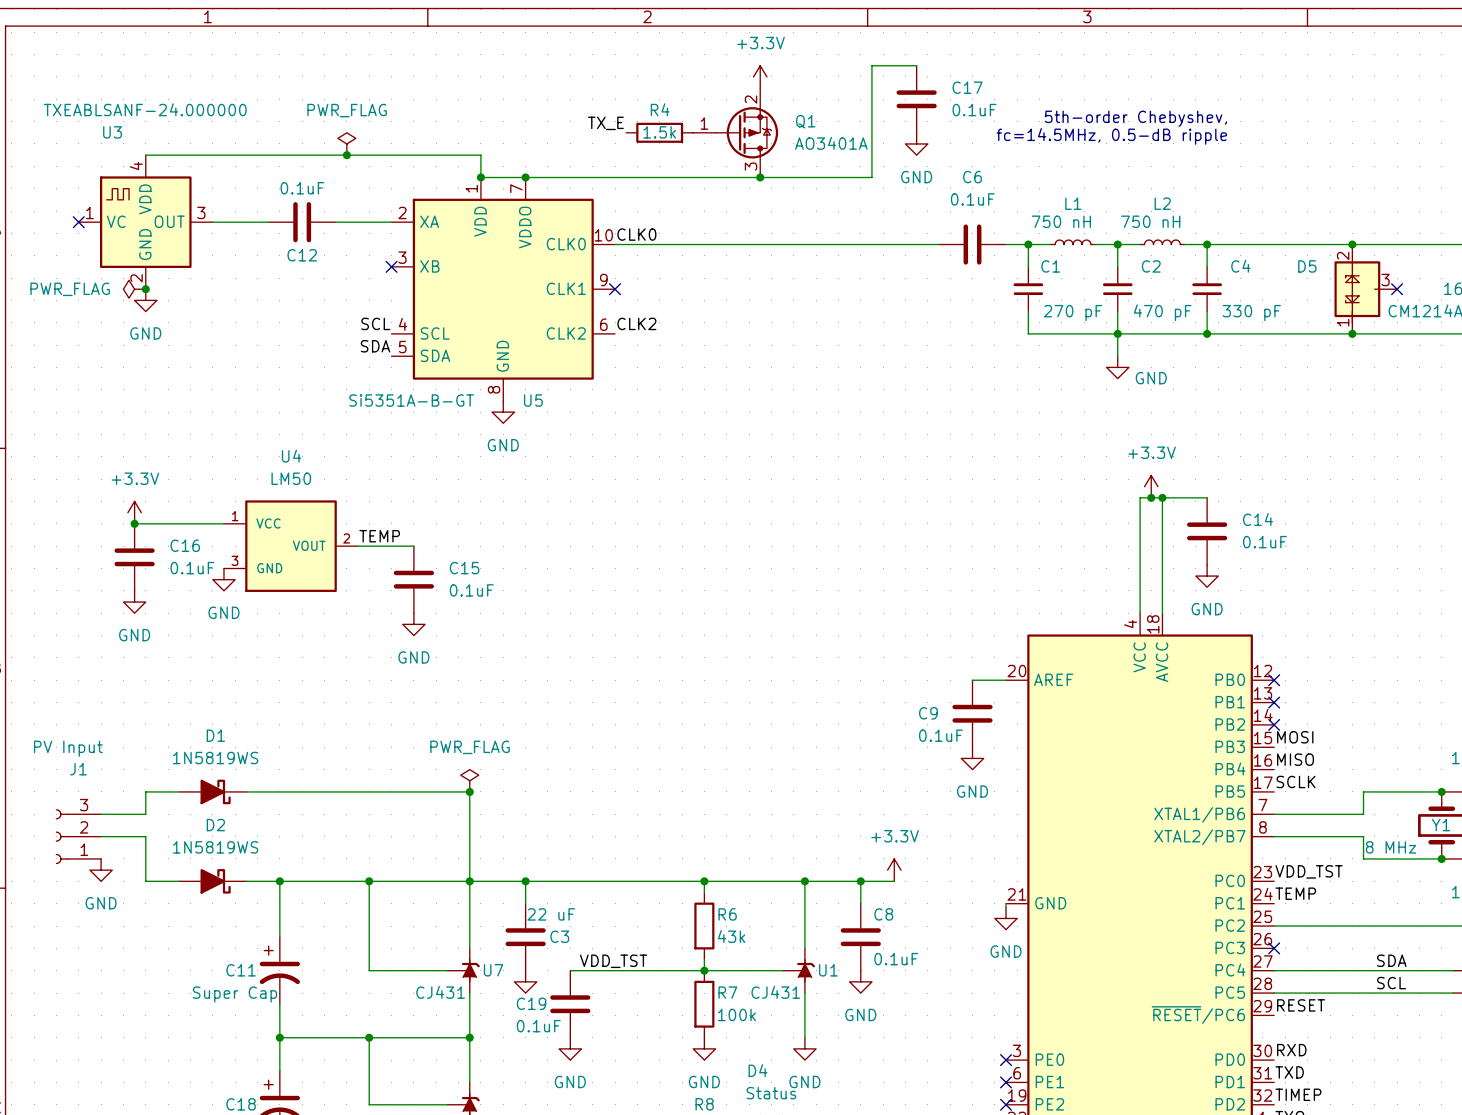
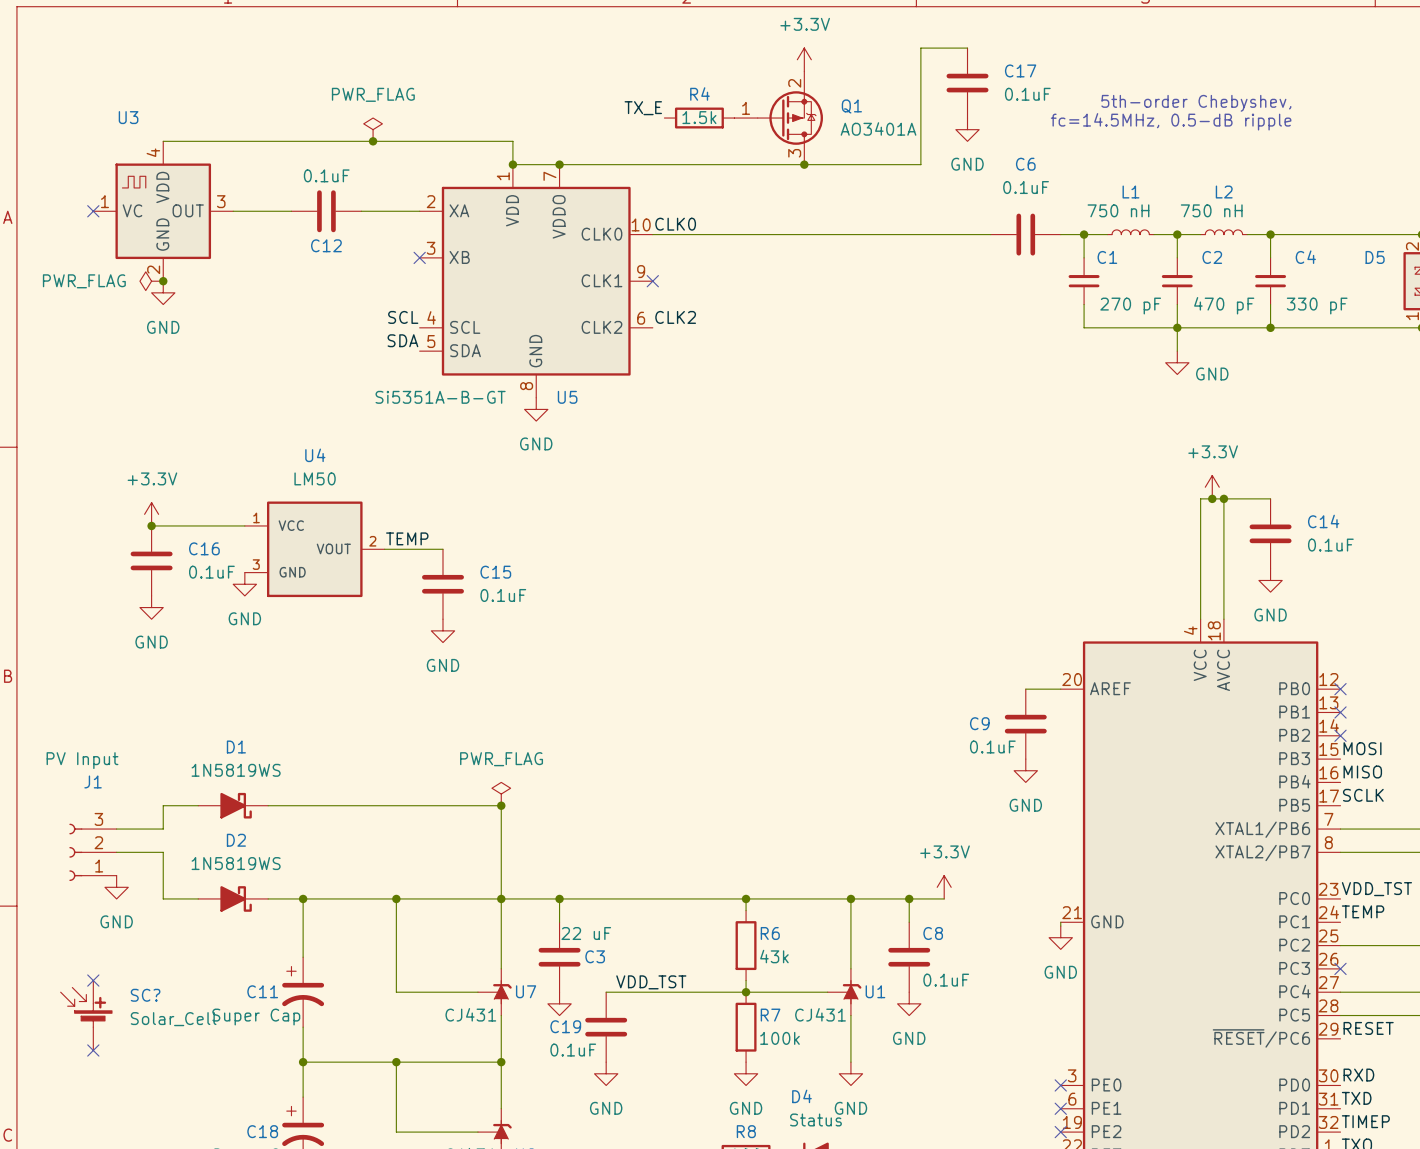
U3 value: TXEABLSANF-24.000000 (145, 109) -> none
no-connect mark: none -> (93, 980)
SC?: none -> Solar_Cell (86, 1015)
no-connect mark: none -> (93, 1050)

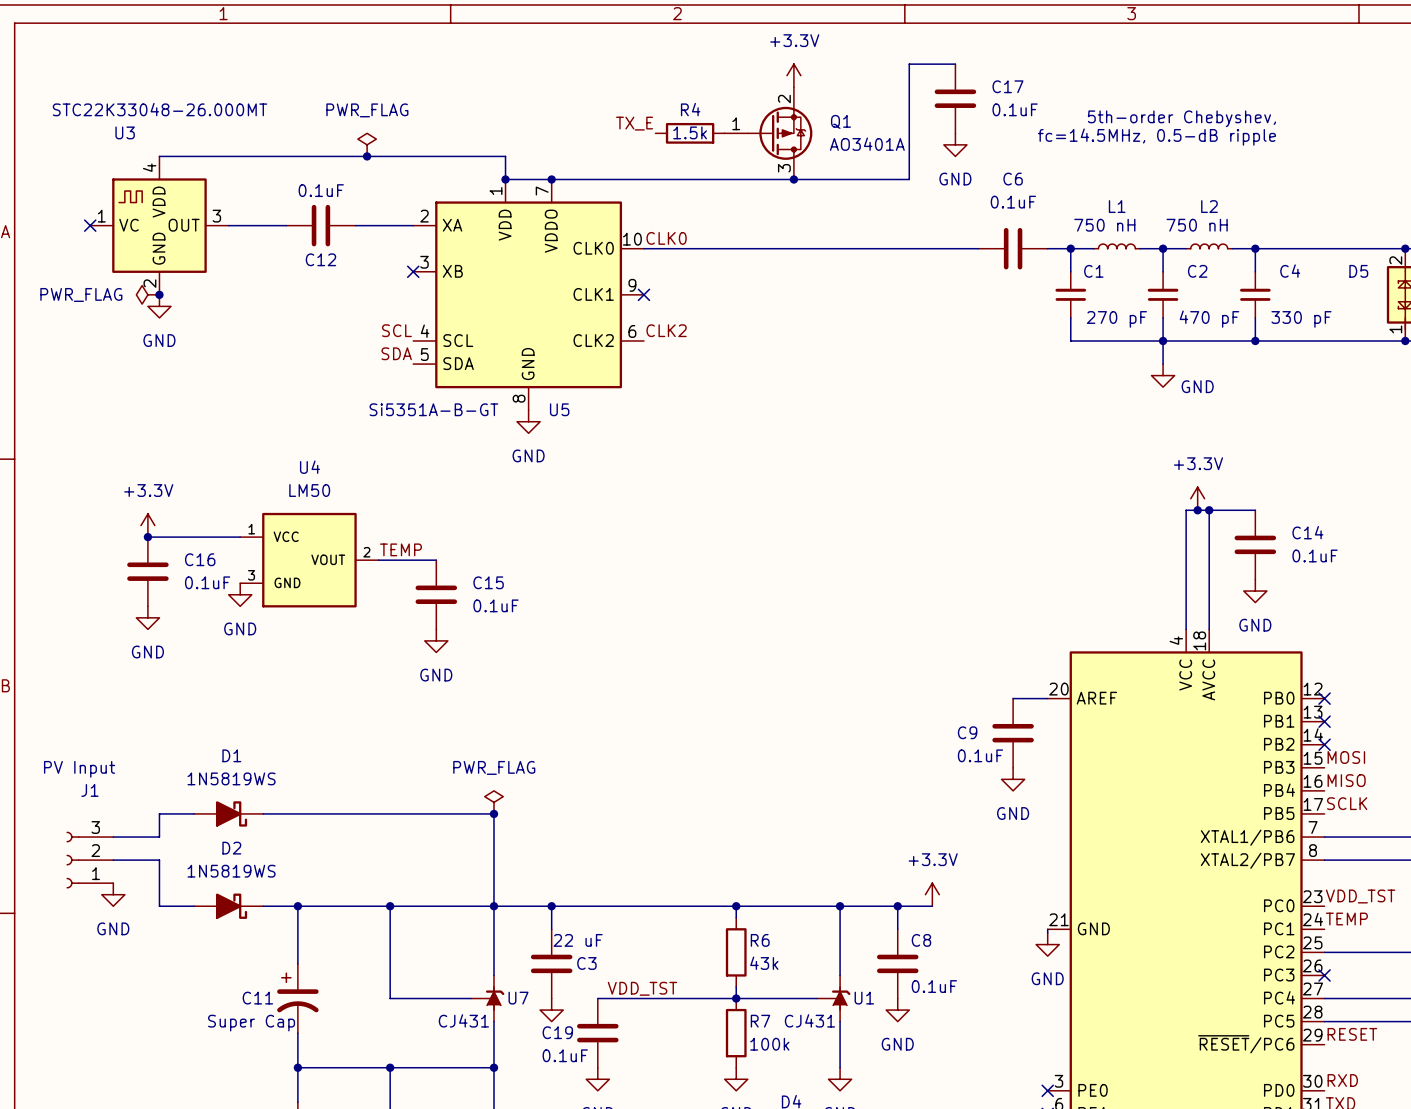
U3 value: none -> STC22K33048-26.000MT (160, 109)
no-connect mark: (93, 980) -> none
SC?: Solar_Cell (86, 1015) -> none
no-connect mark: (93, 1050) -> none

